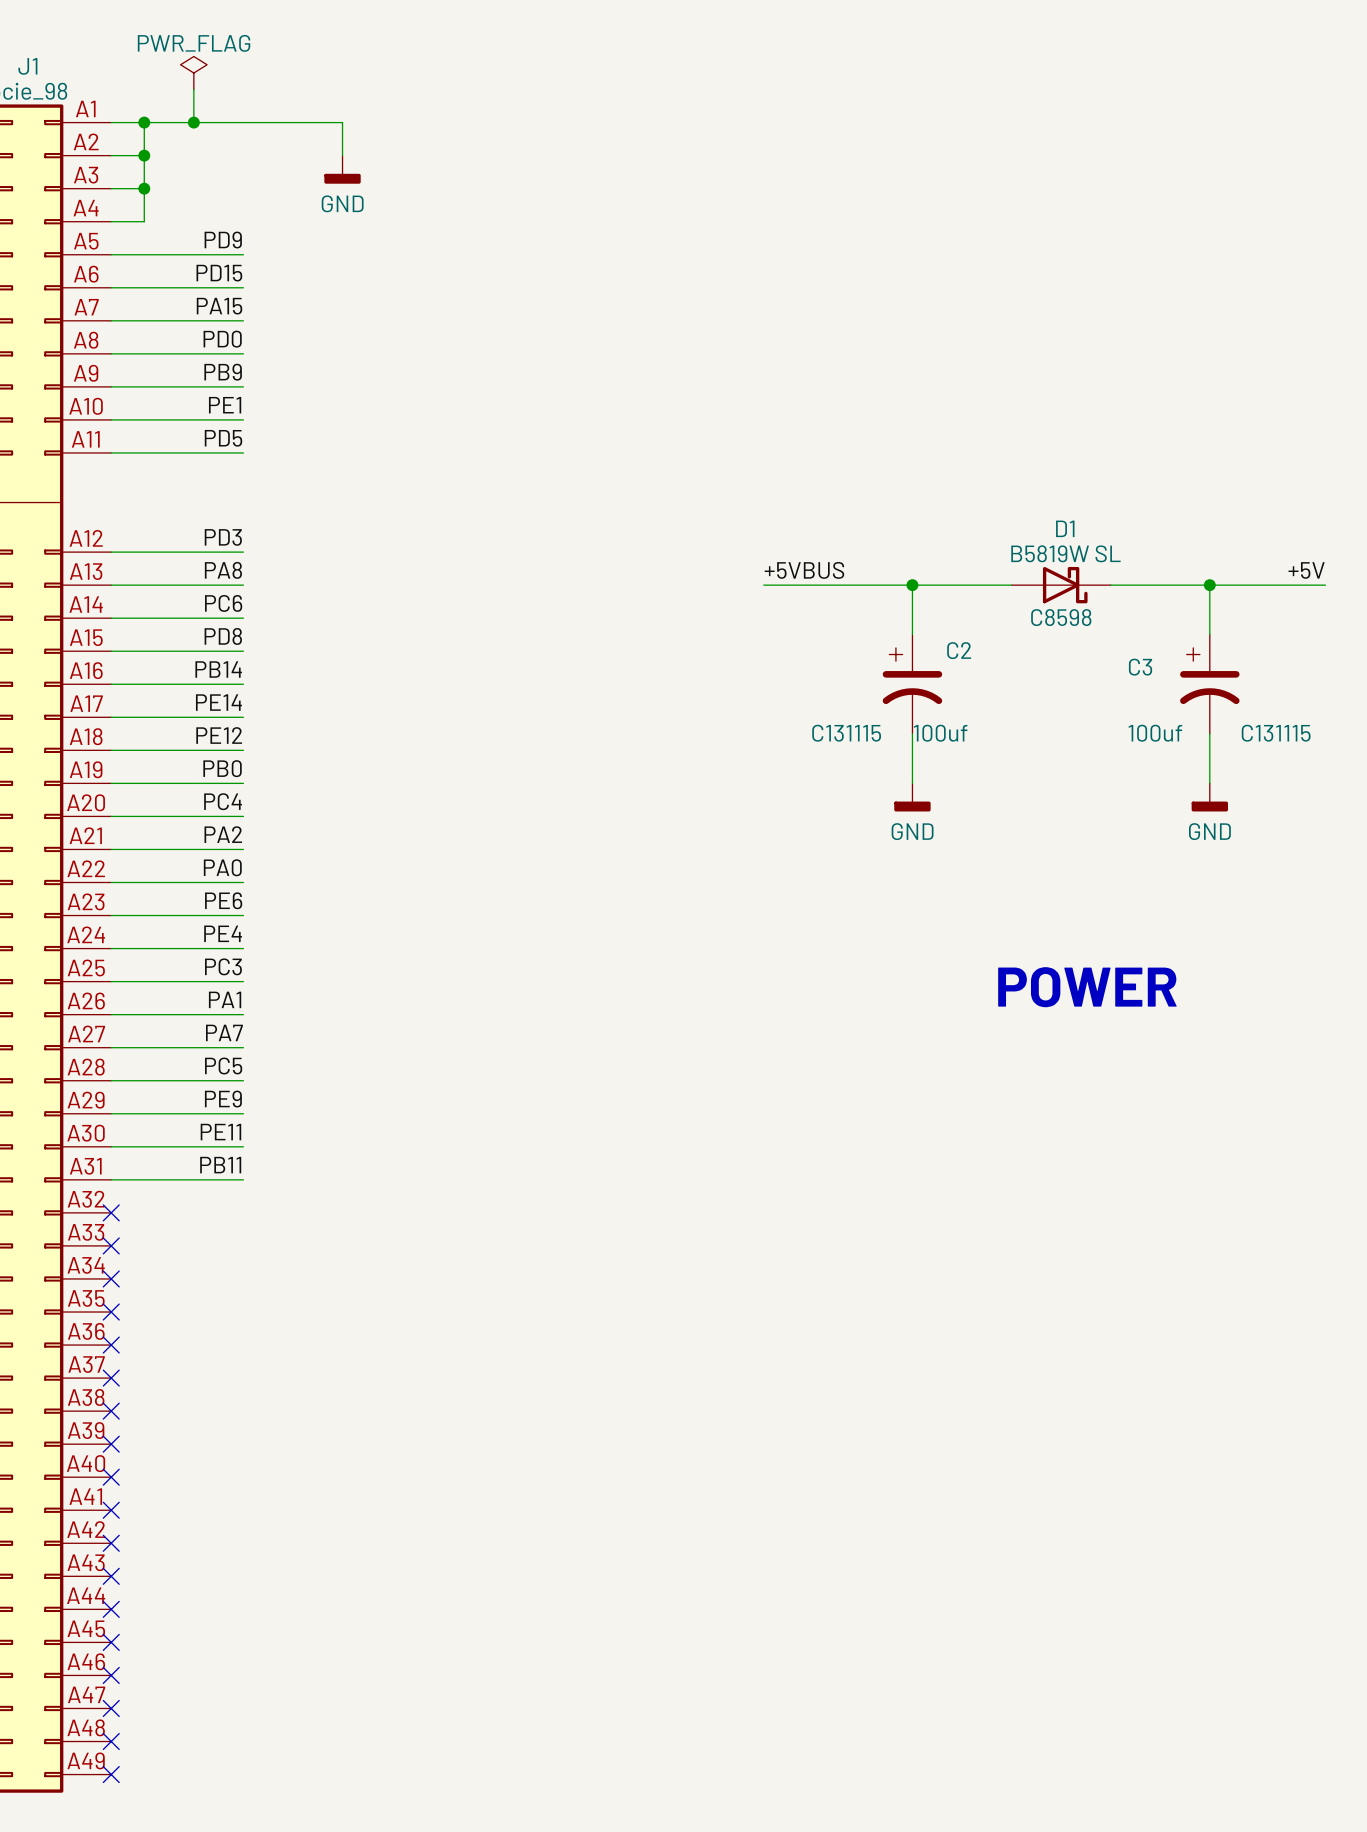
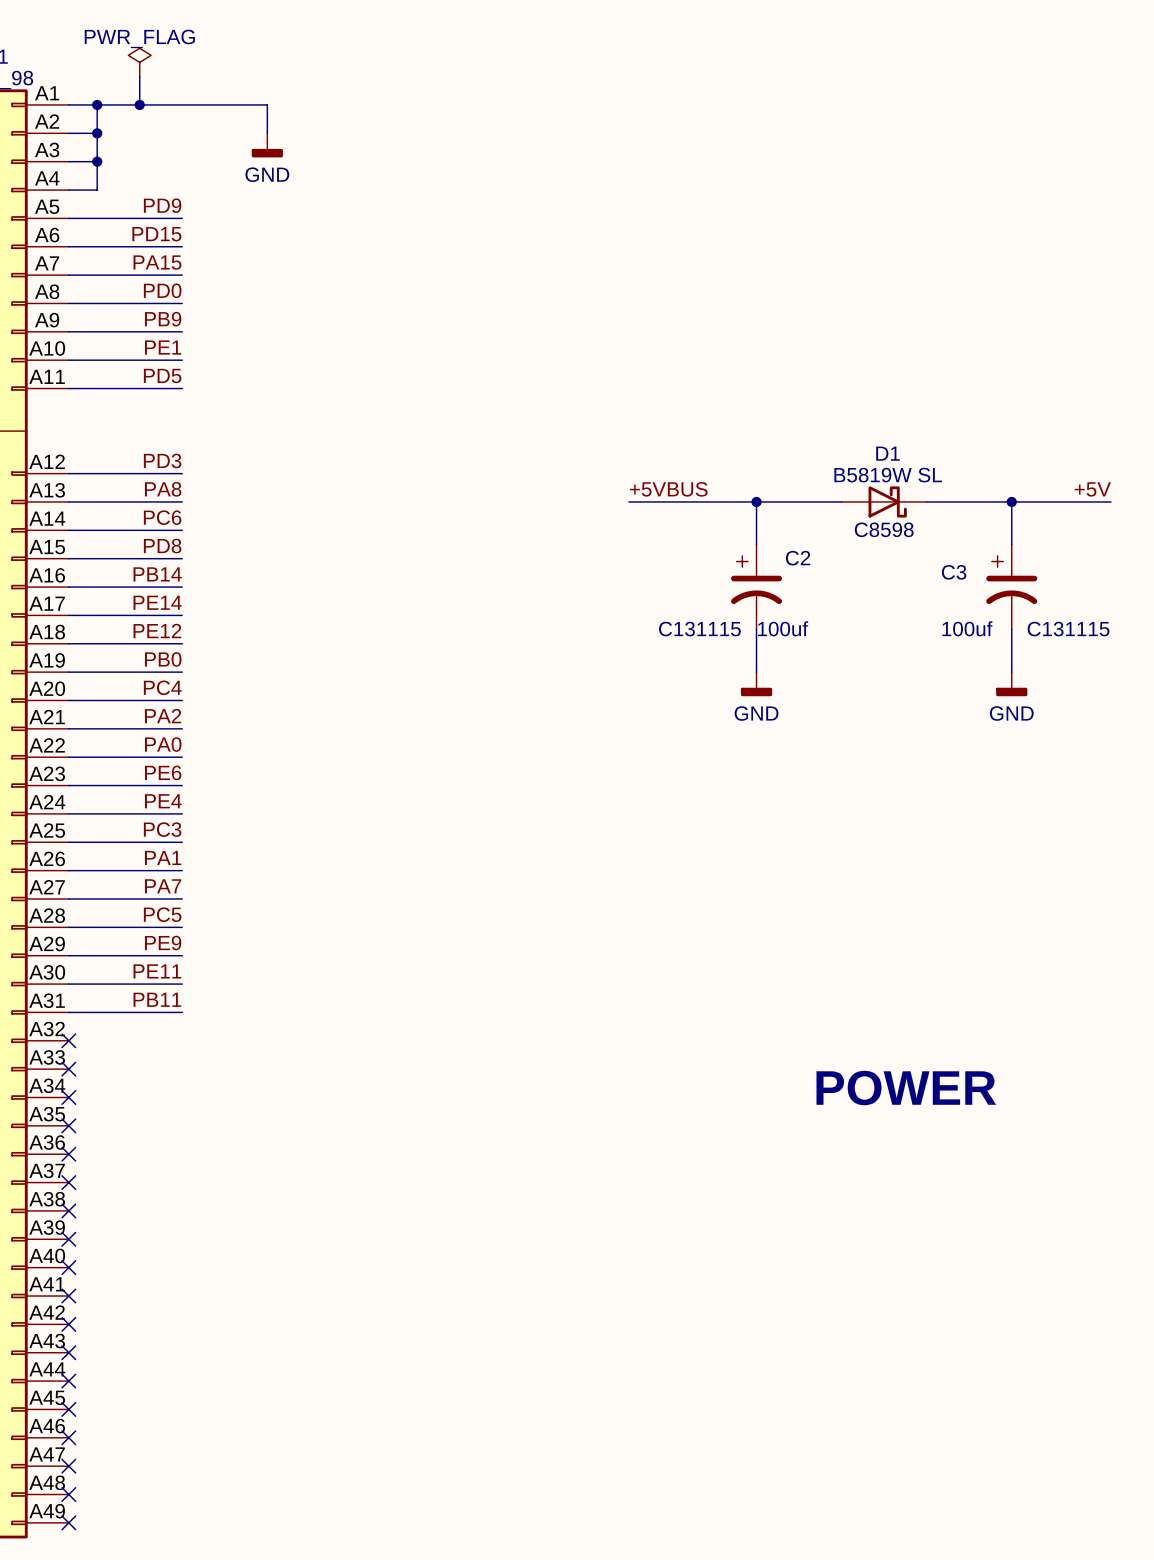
text position: POWER (1087, 987) -> POWER (906, 1088)

